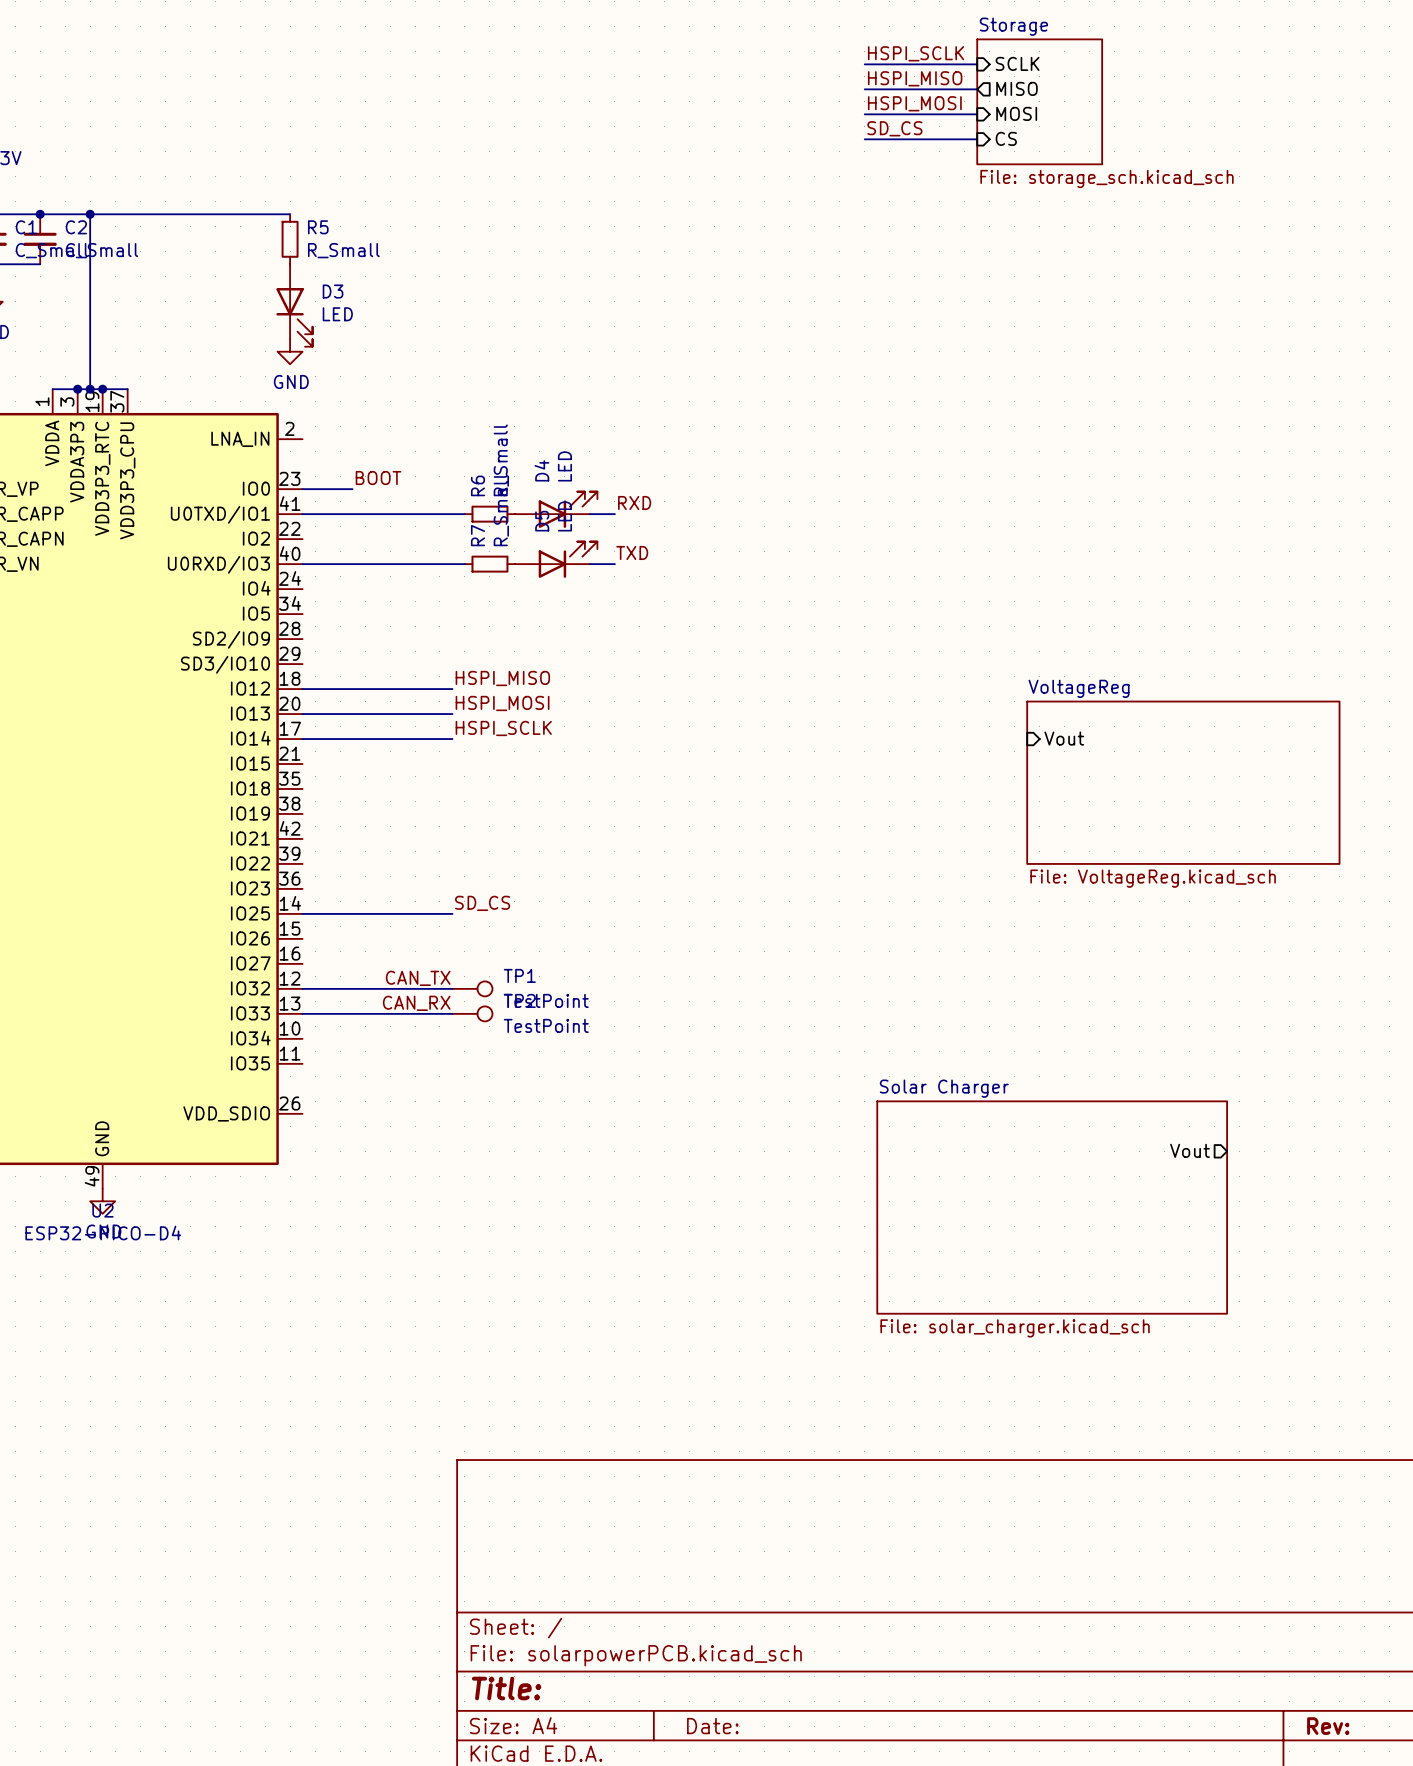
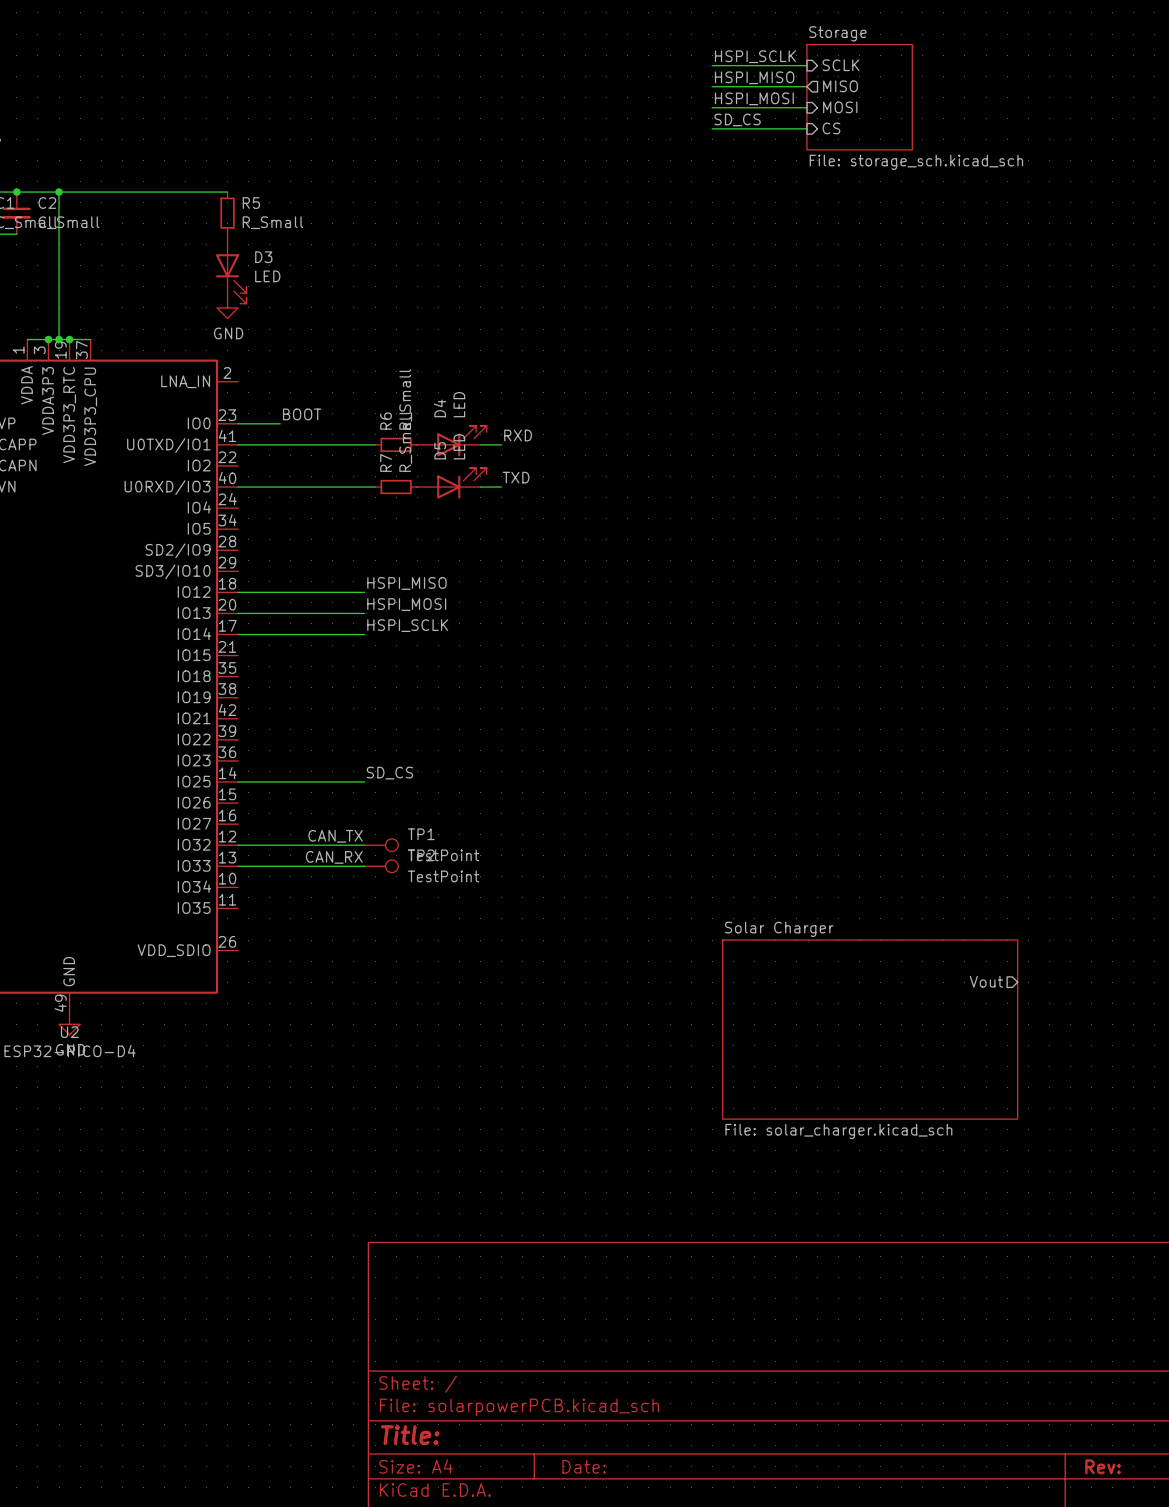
sheet pin: Vout (1064, 738) -> none
sheet VoltageReg: File: VoltageReg.kicad_sch (1183, 782) -> none

